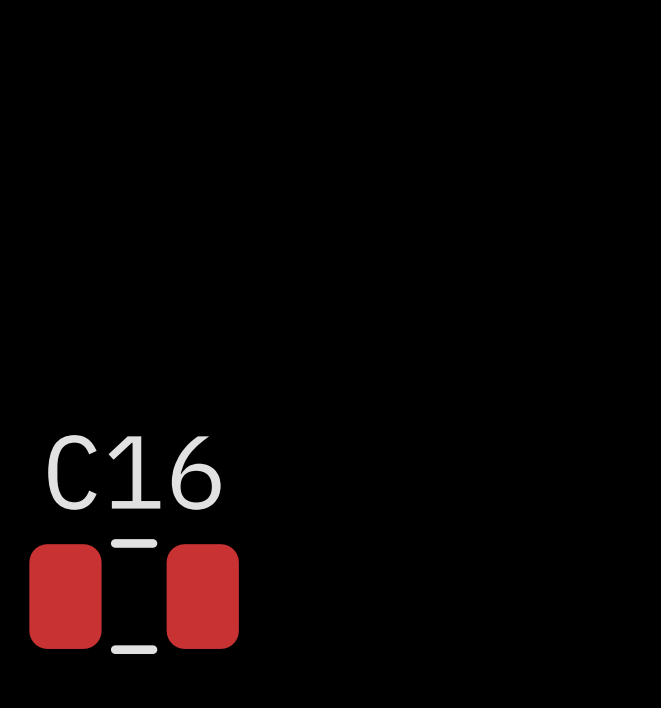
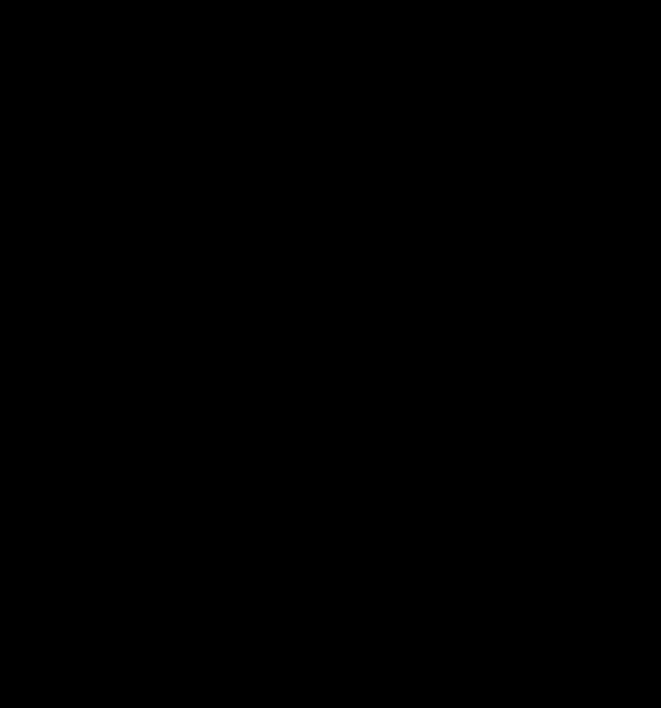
C16: (134, 596) -> none

